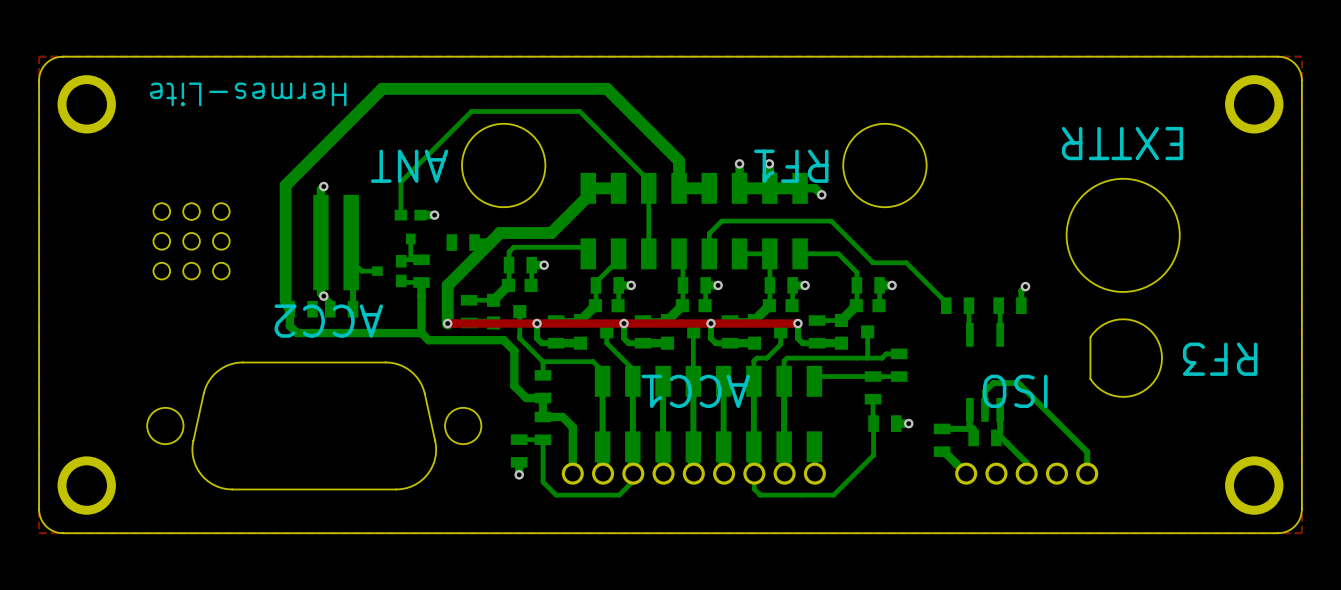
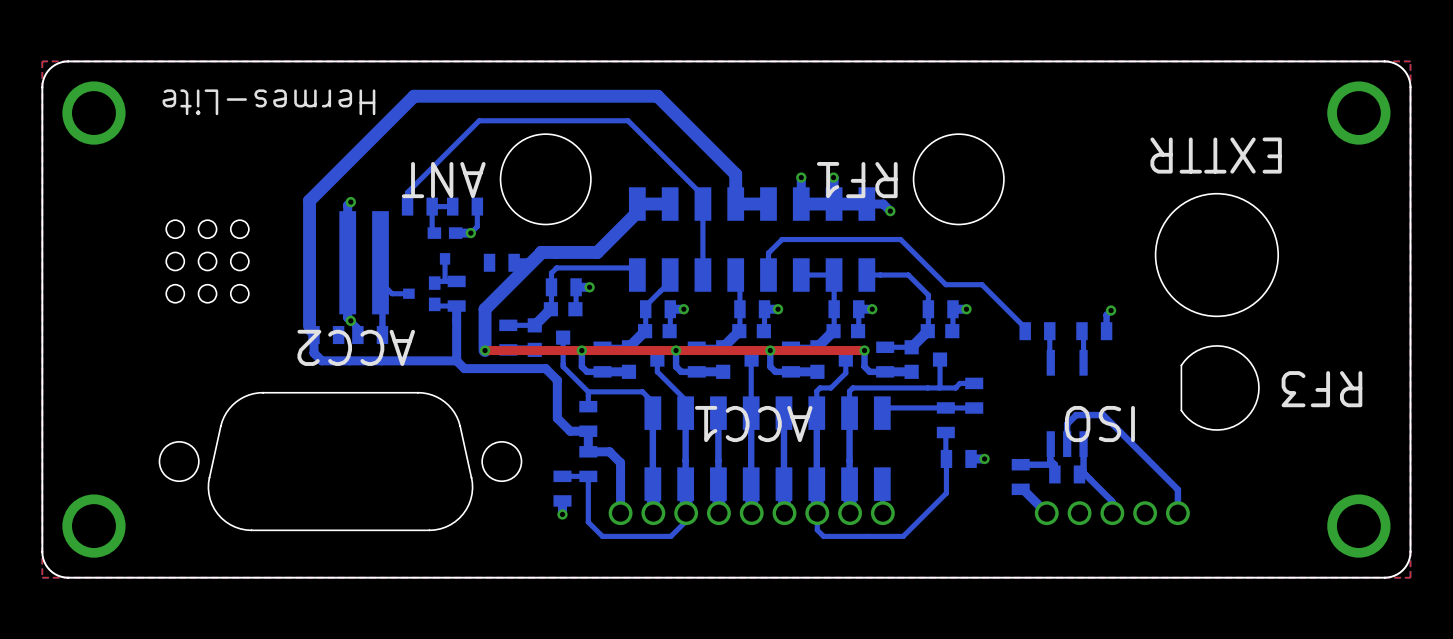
bottom track: (471, 111) (400, 182) (400, 215) -> (510, 120) (479, 120) (407, 192) (407, 206)
part: none -> (419, 206)
bottom track: none -> (452, 206) (432, 206) (432, 230) (434, 233)
part: none -> (465, 206)
bottom track: none -> (477, 206) (477, 226) (470, 233)

